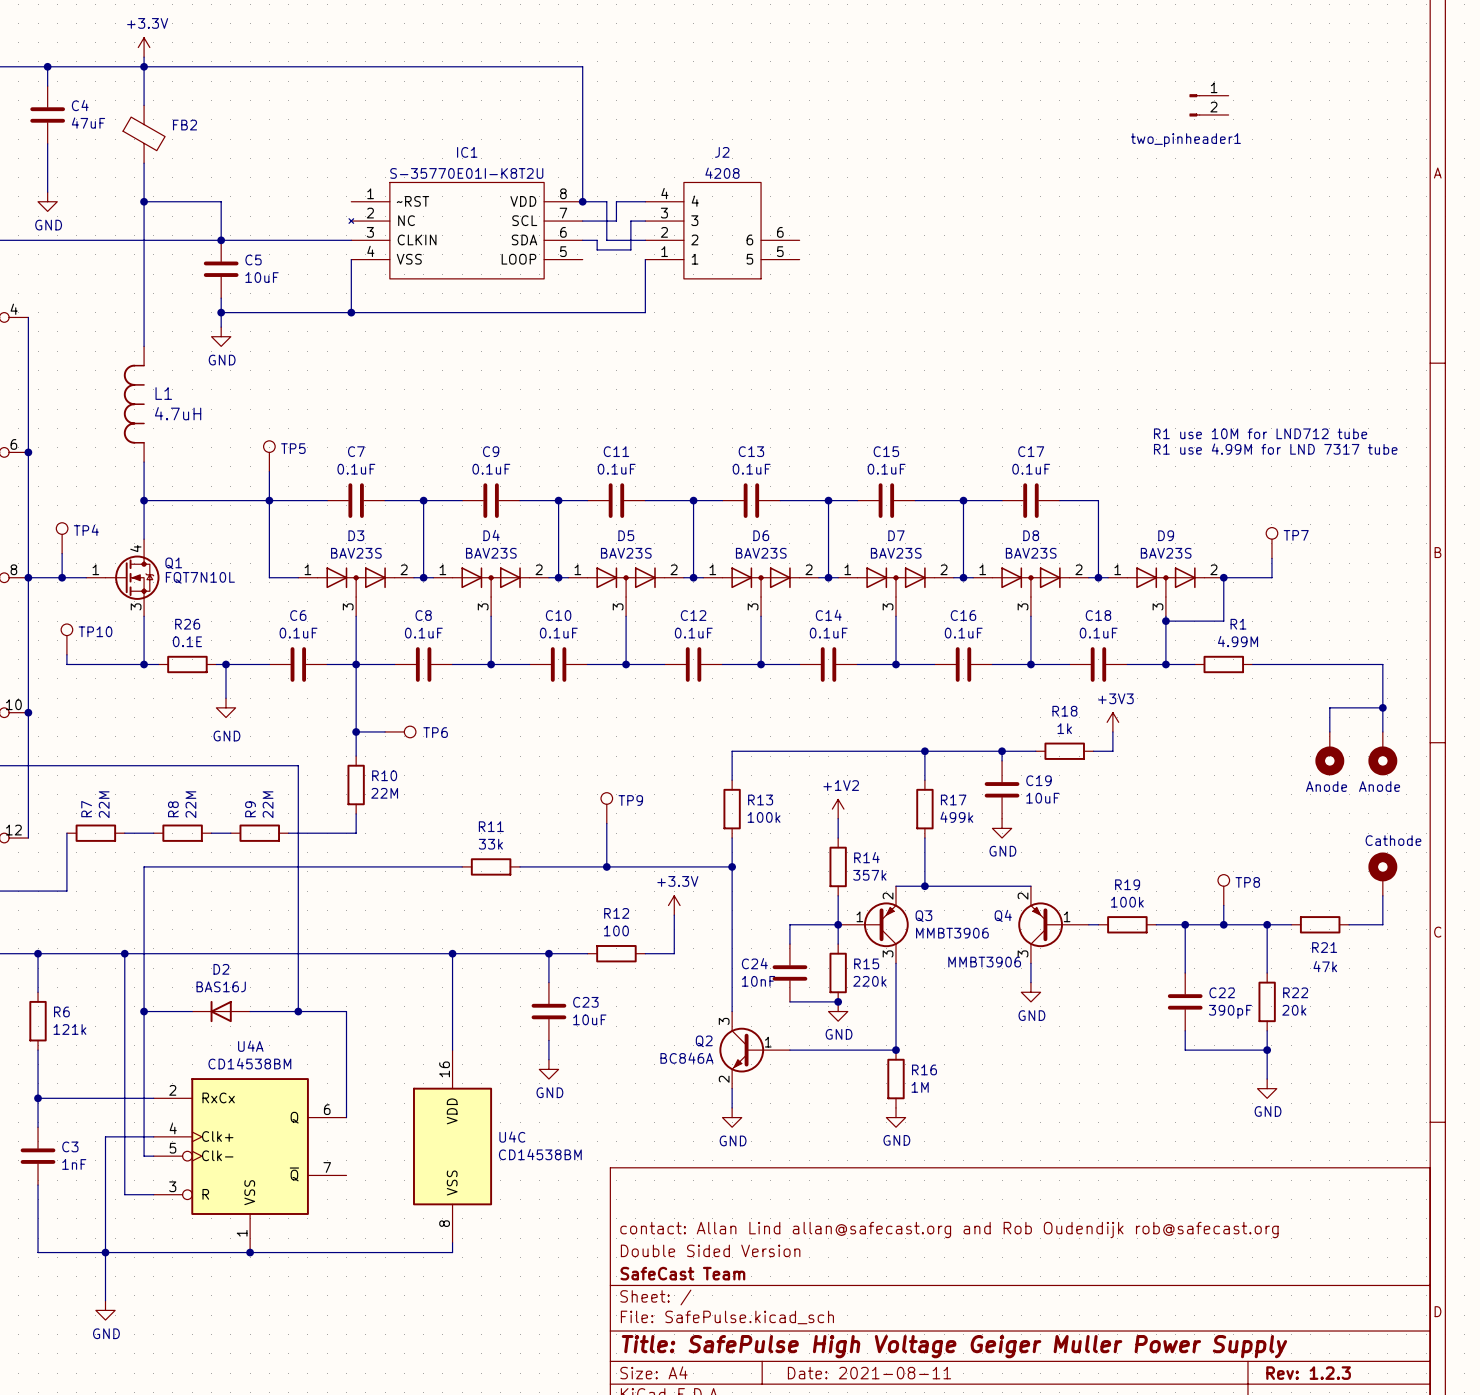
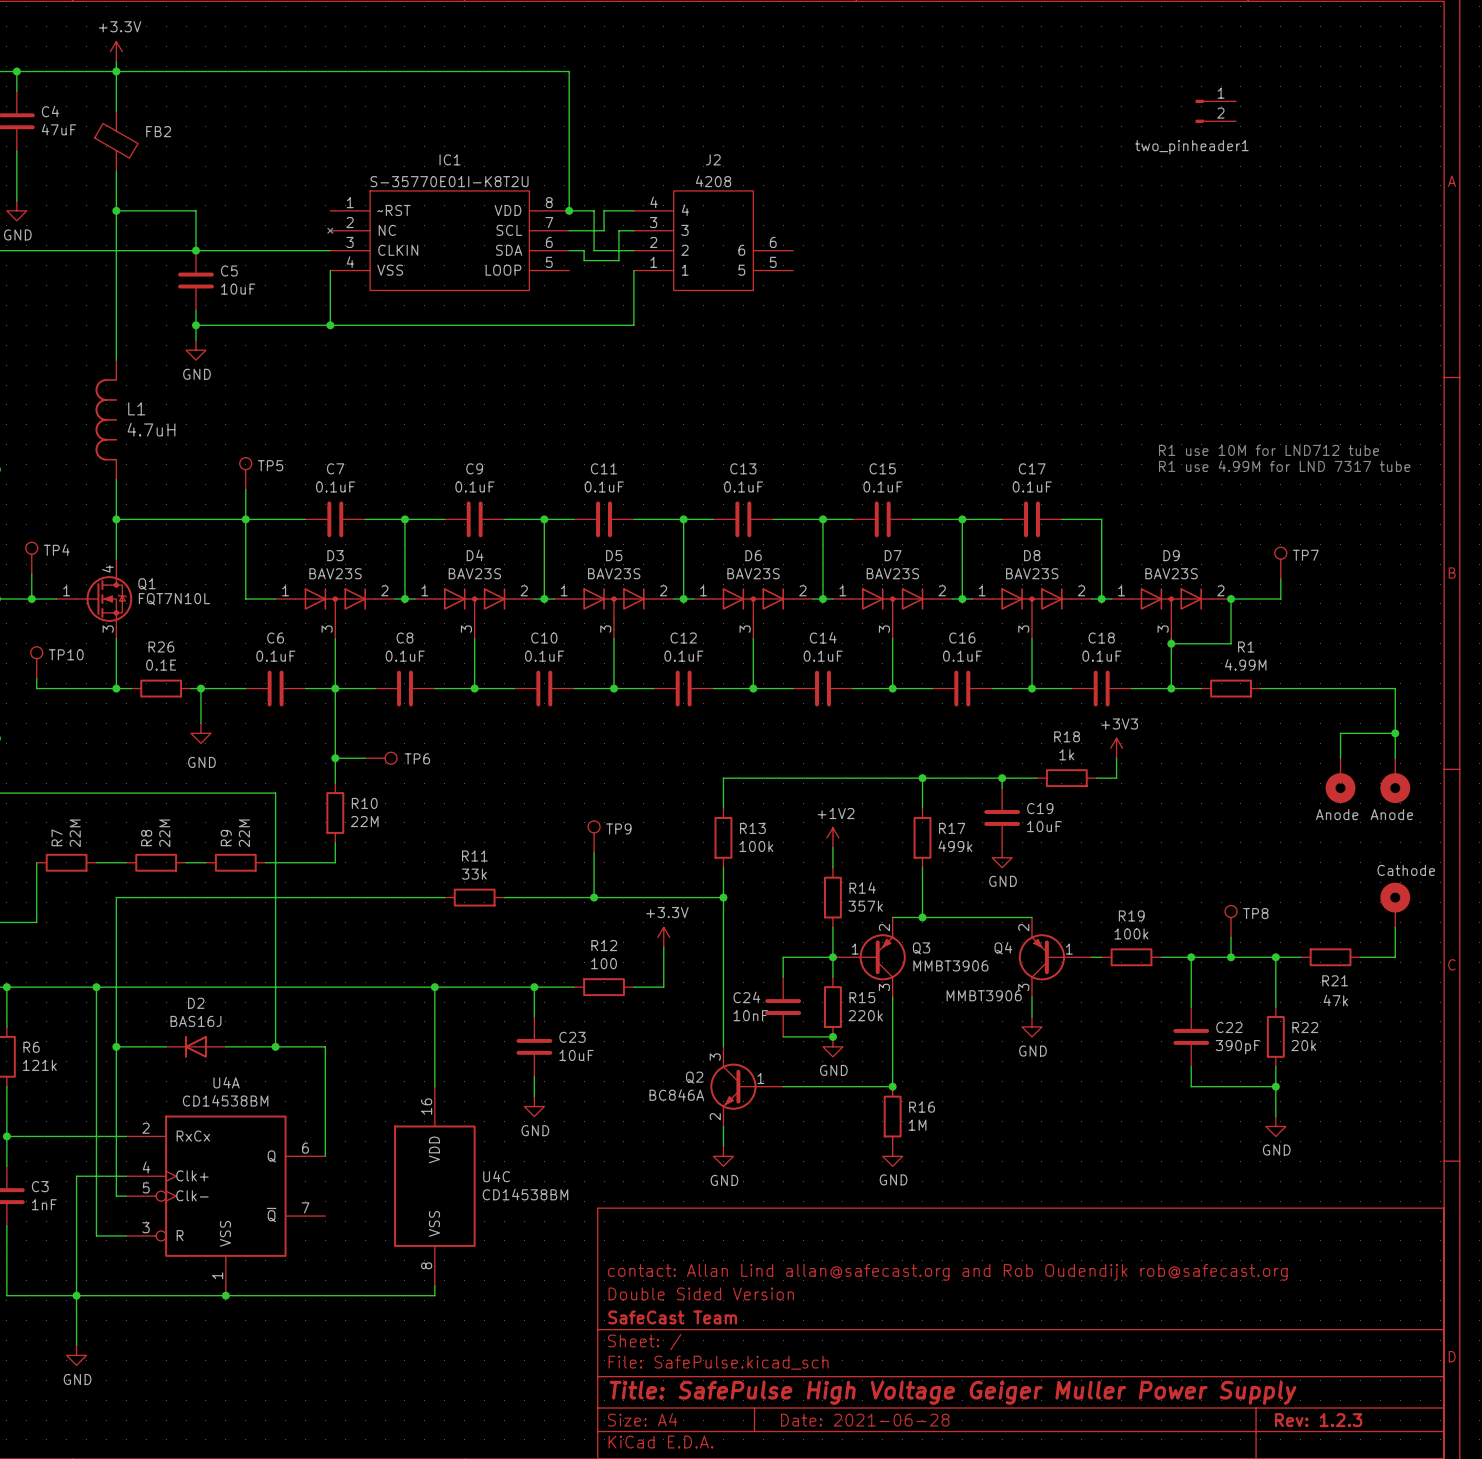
title block: Date: 2021-08-11 (869, 1373) -> Date: 2021-06-28 (865, 1420)

